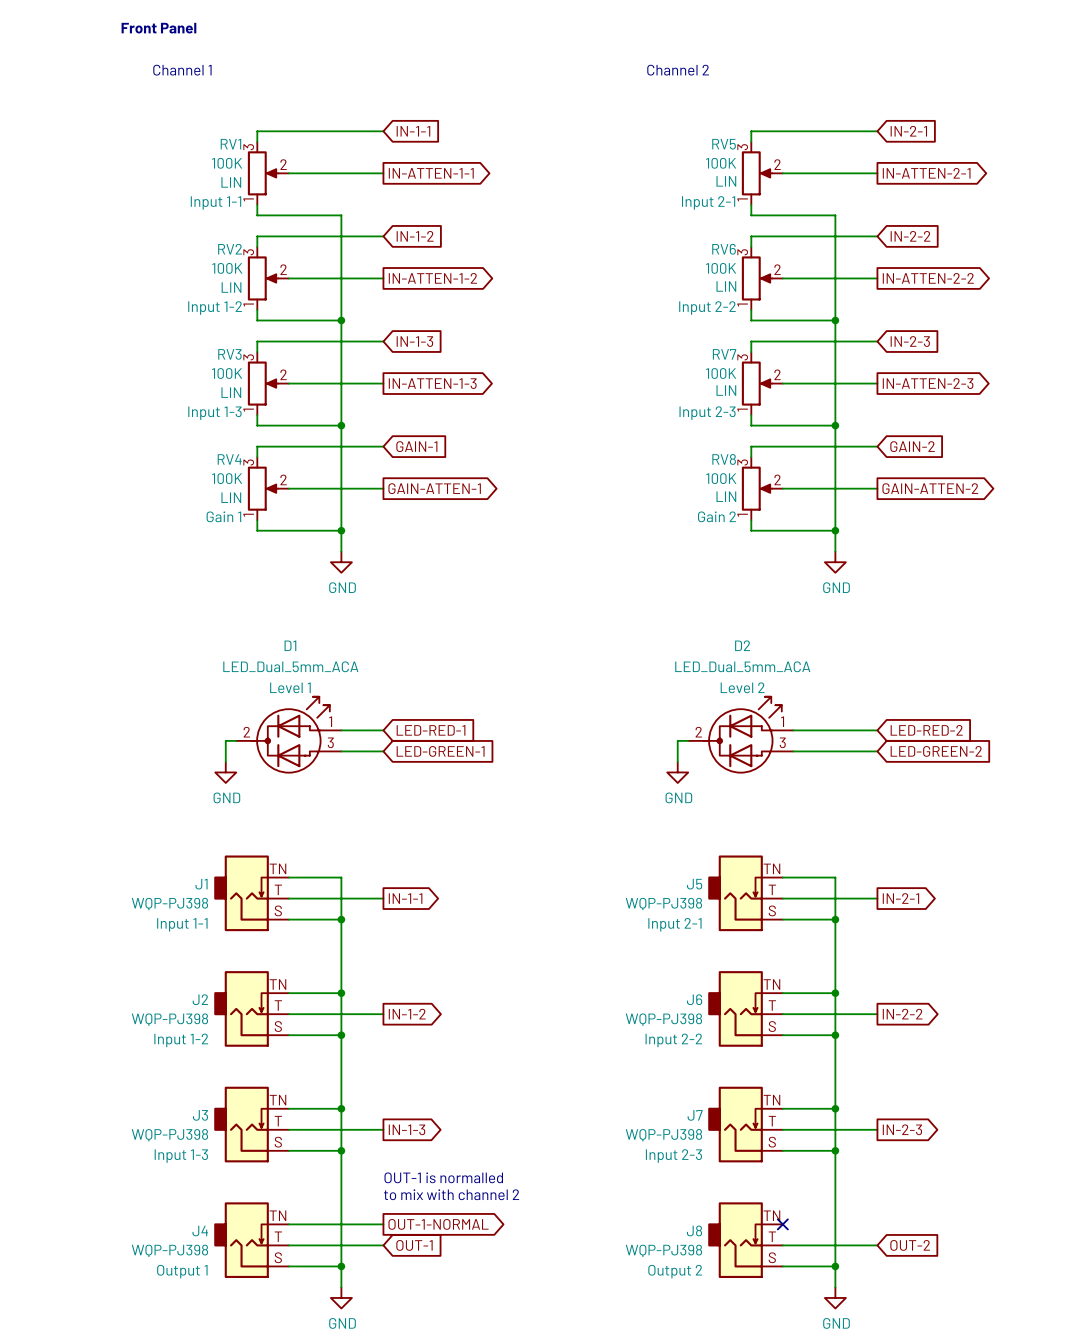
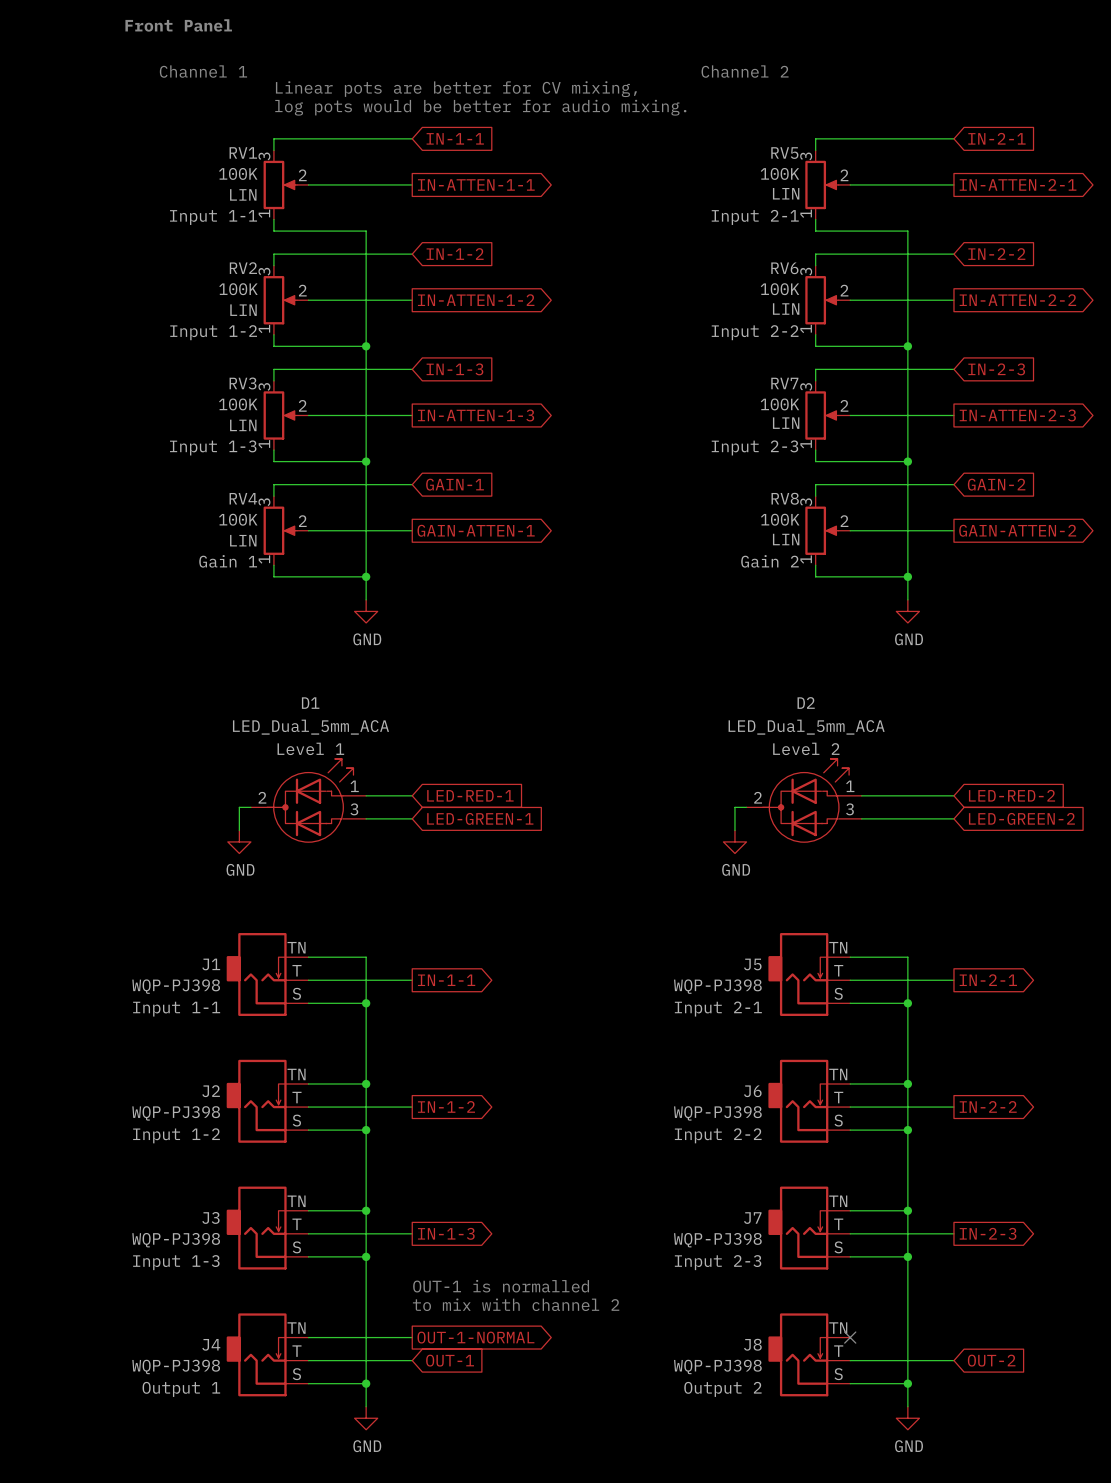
text: none -> Linear pots are better for CV mixing, (456, 89)
text: none -> log pots would be better for audio mixing. (480, 107)

